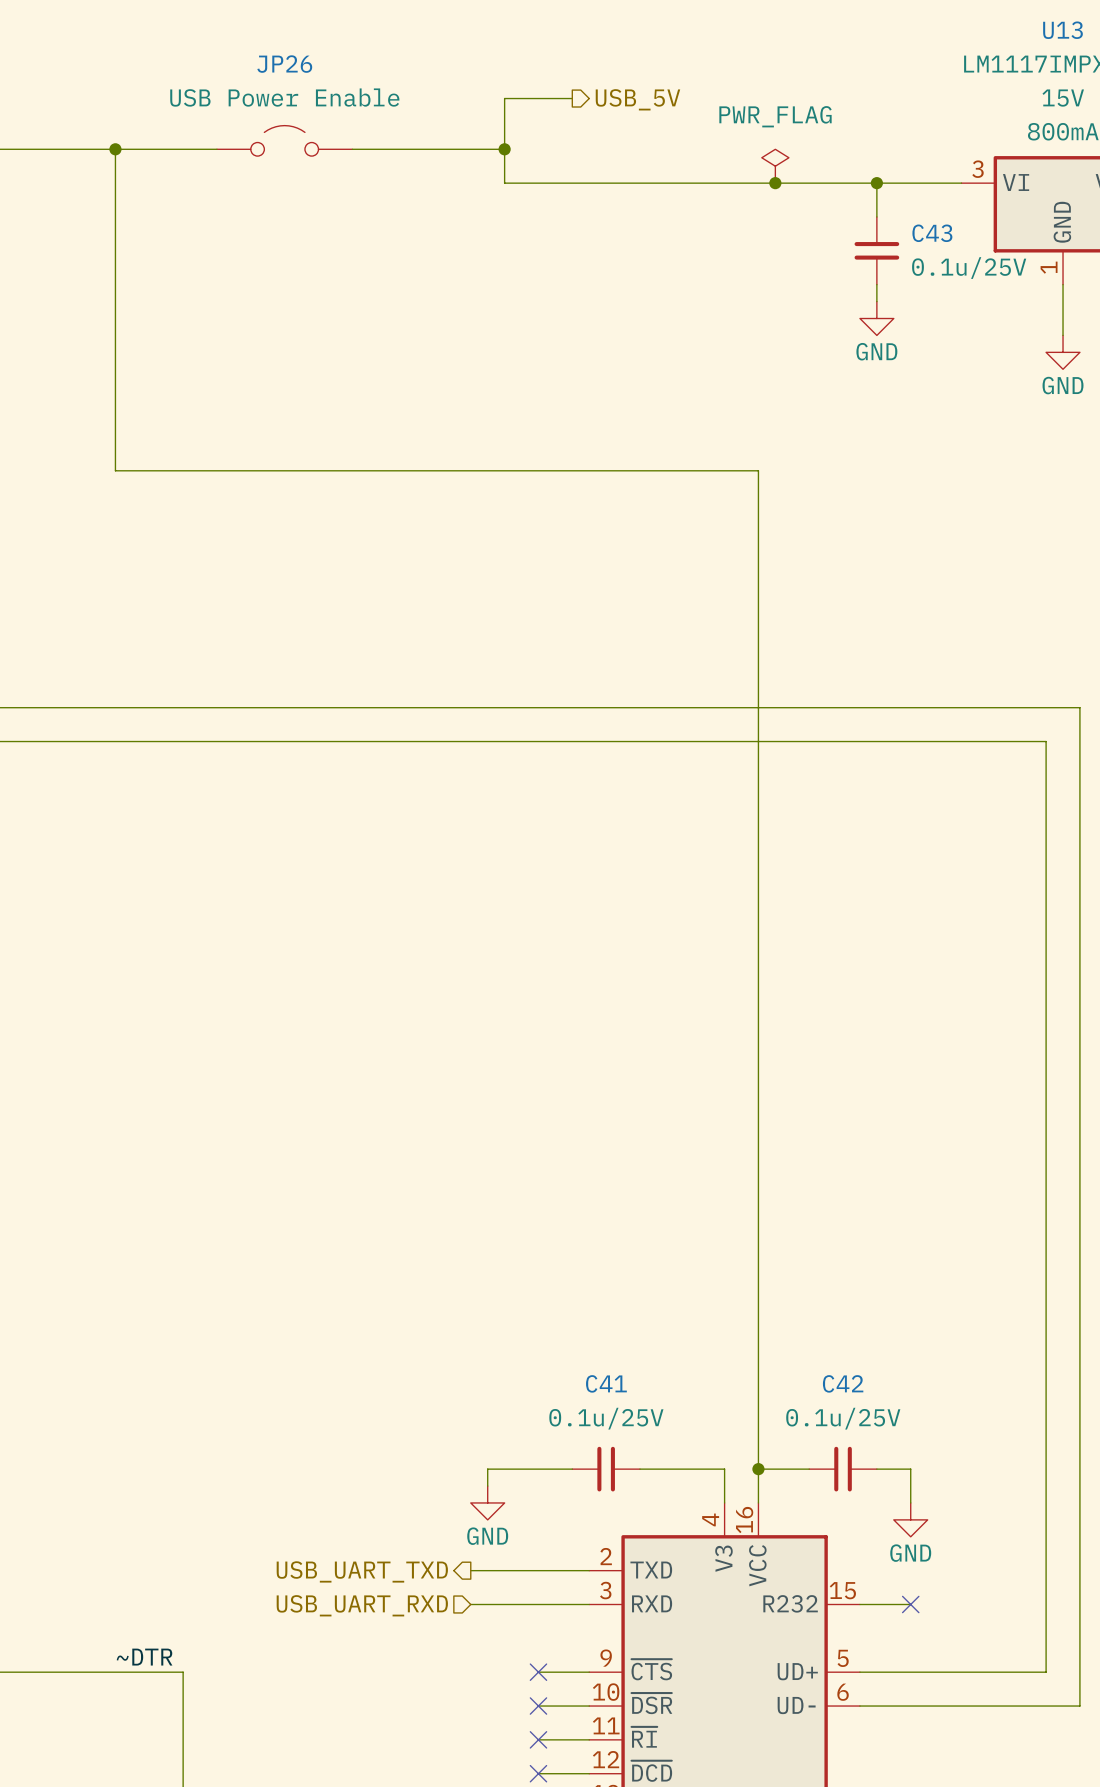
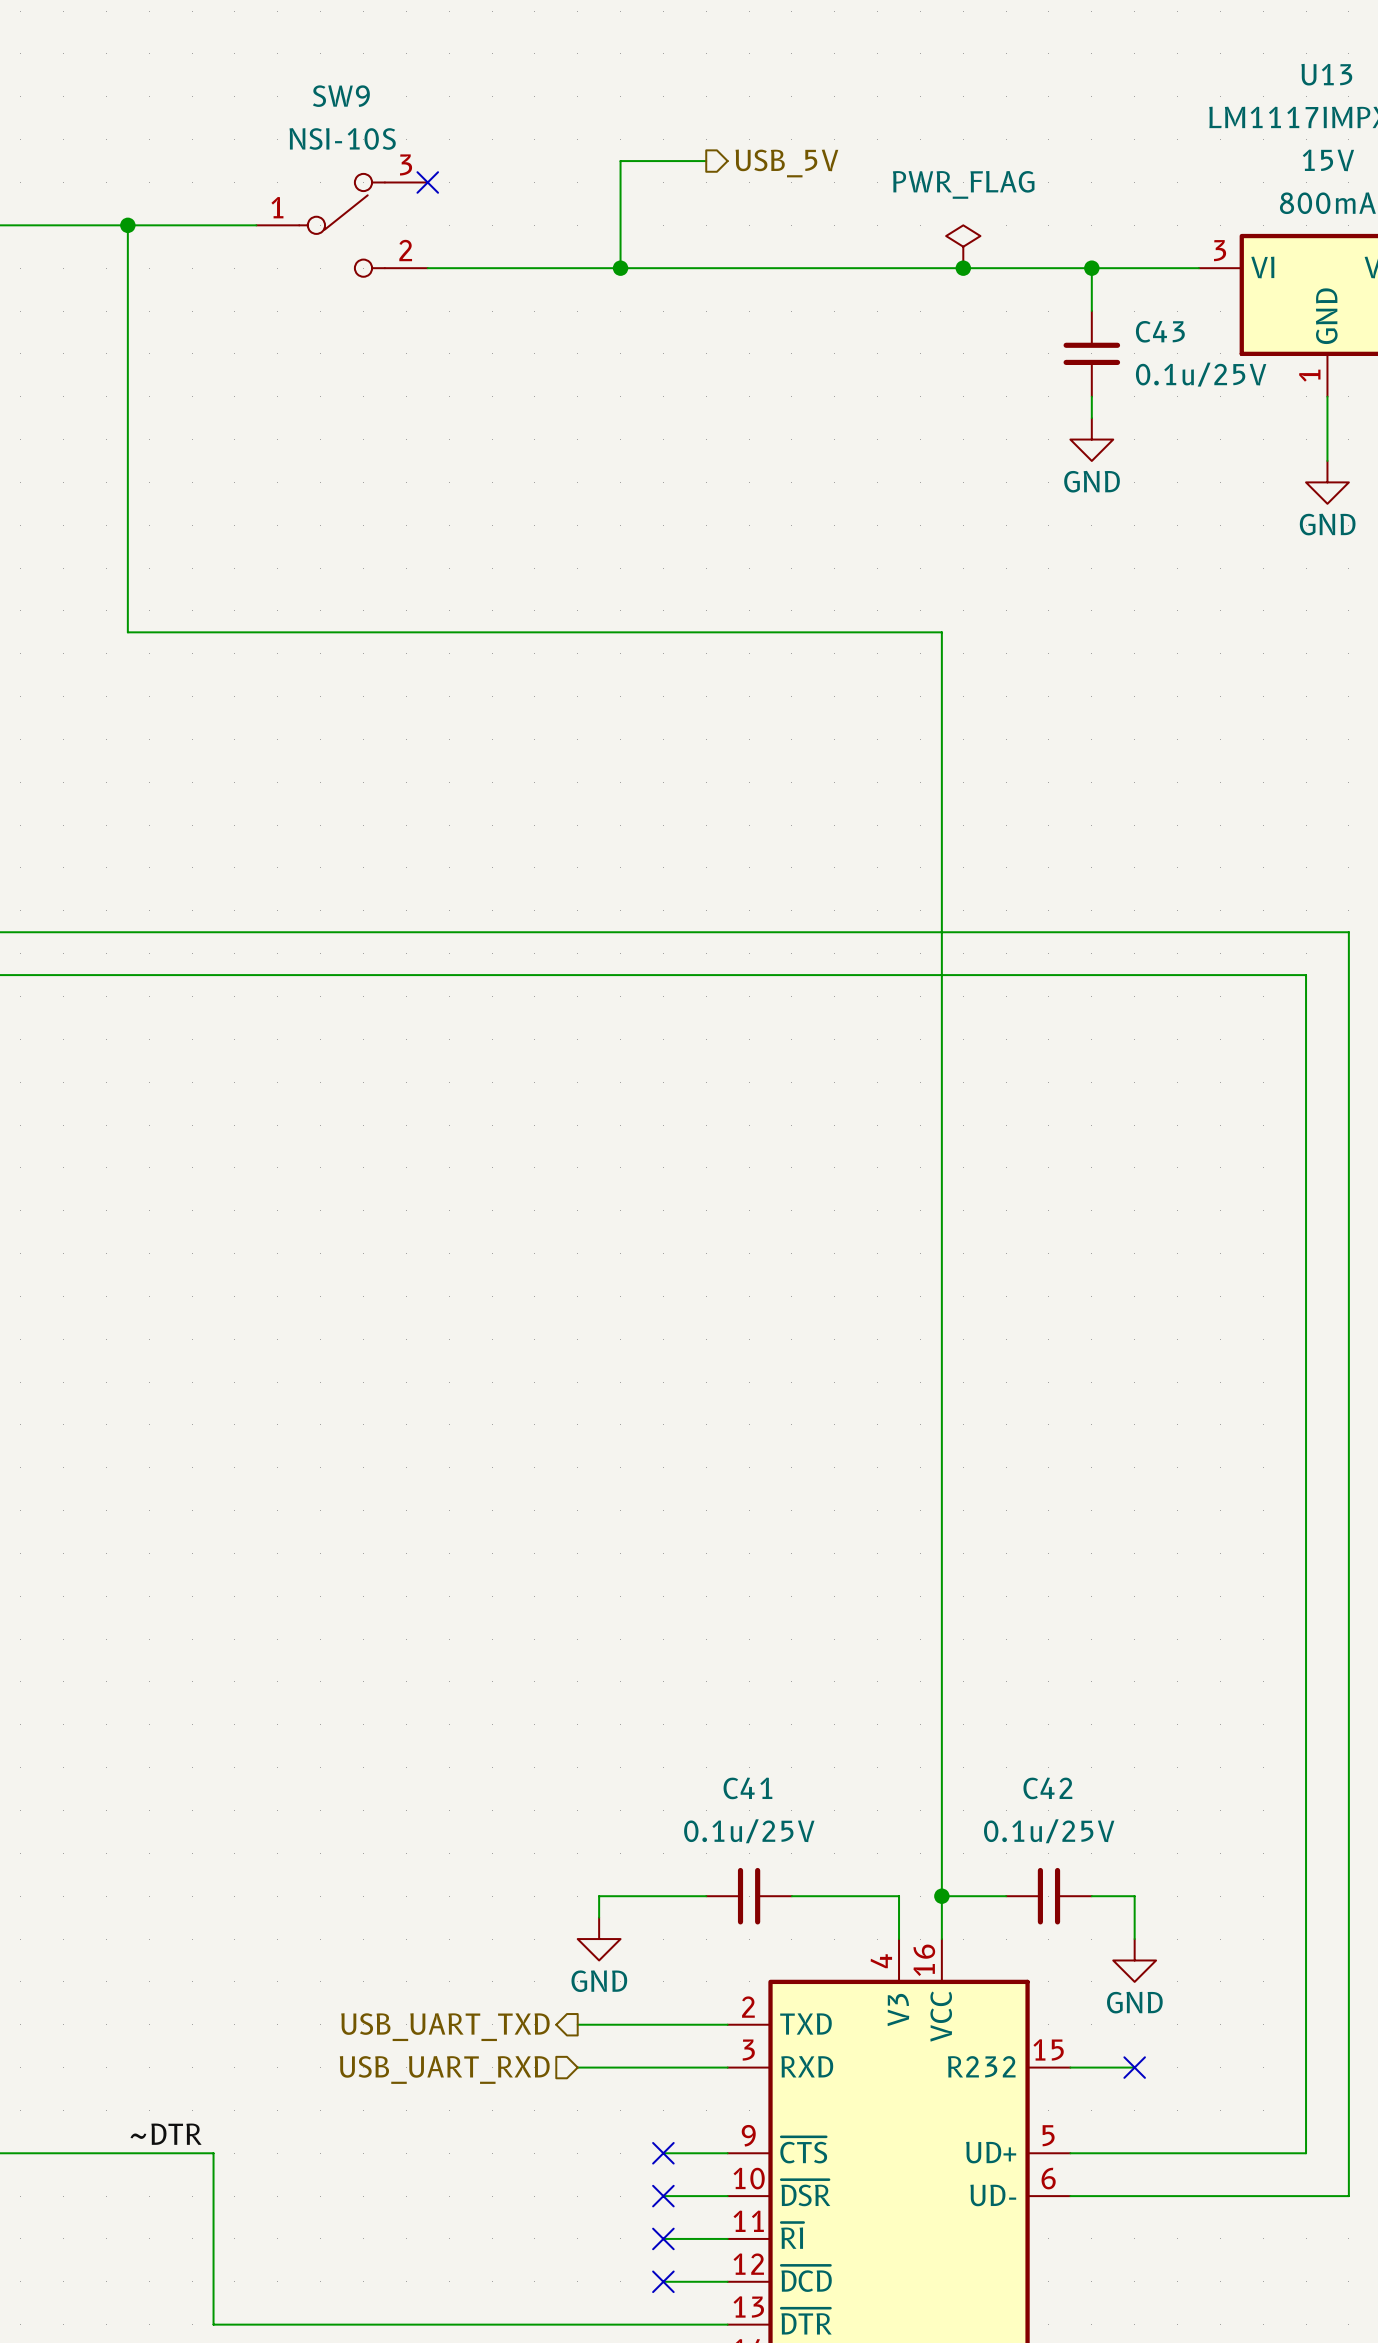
no-connect mark: none -> (427, 182)
JP26: USB Power Enable (284, 140) -> none
SW9: none -> NSI-10S (342, 225)
wire: (352, 149) (504, 149) -> (427, 268) (620, 268)
junction position: (504, 149) -> (620, 268)

